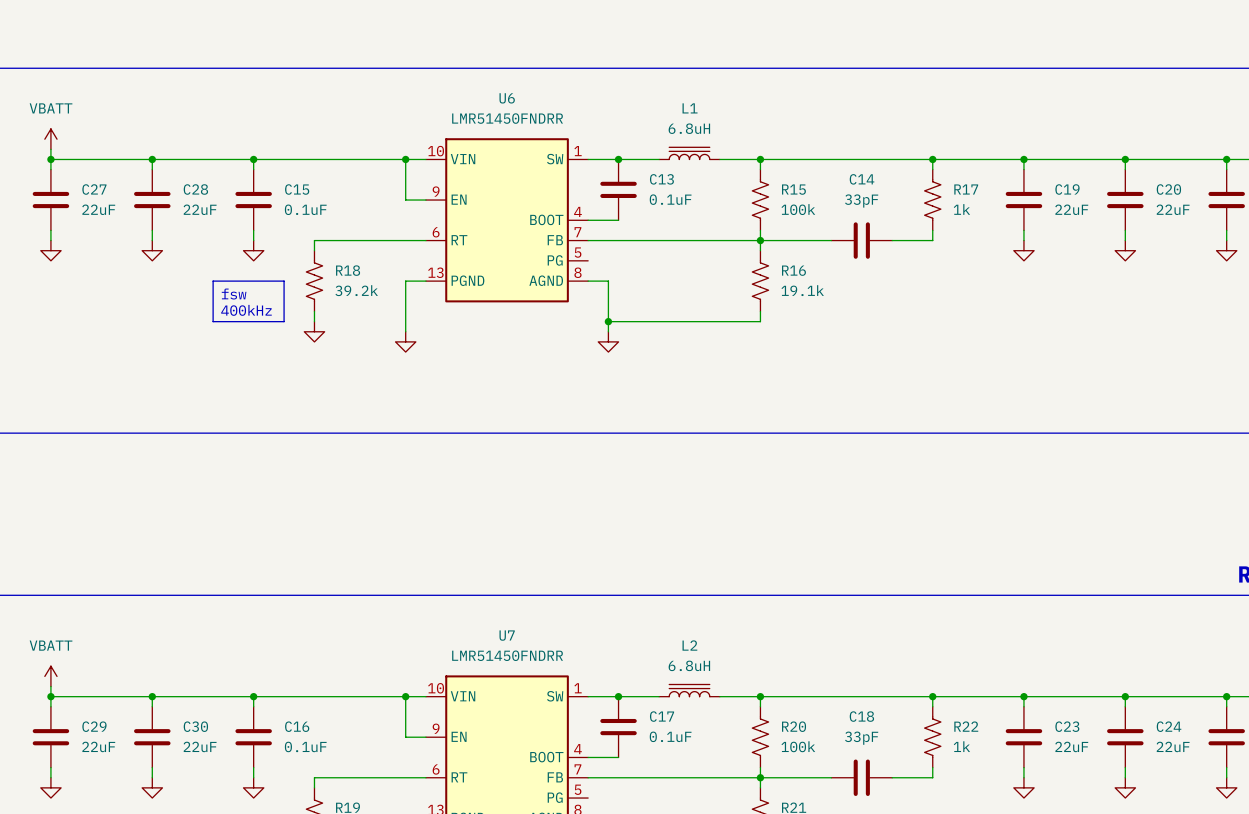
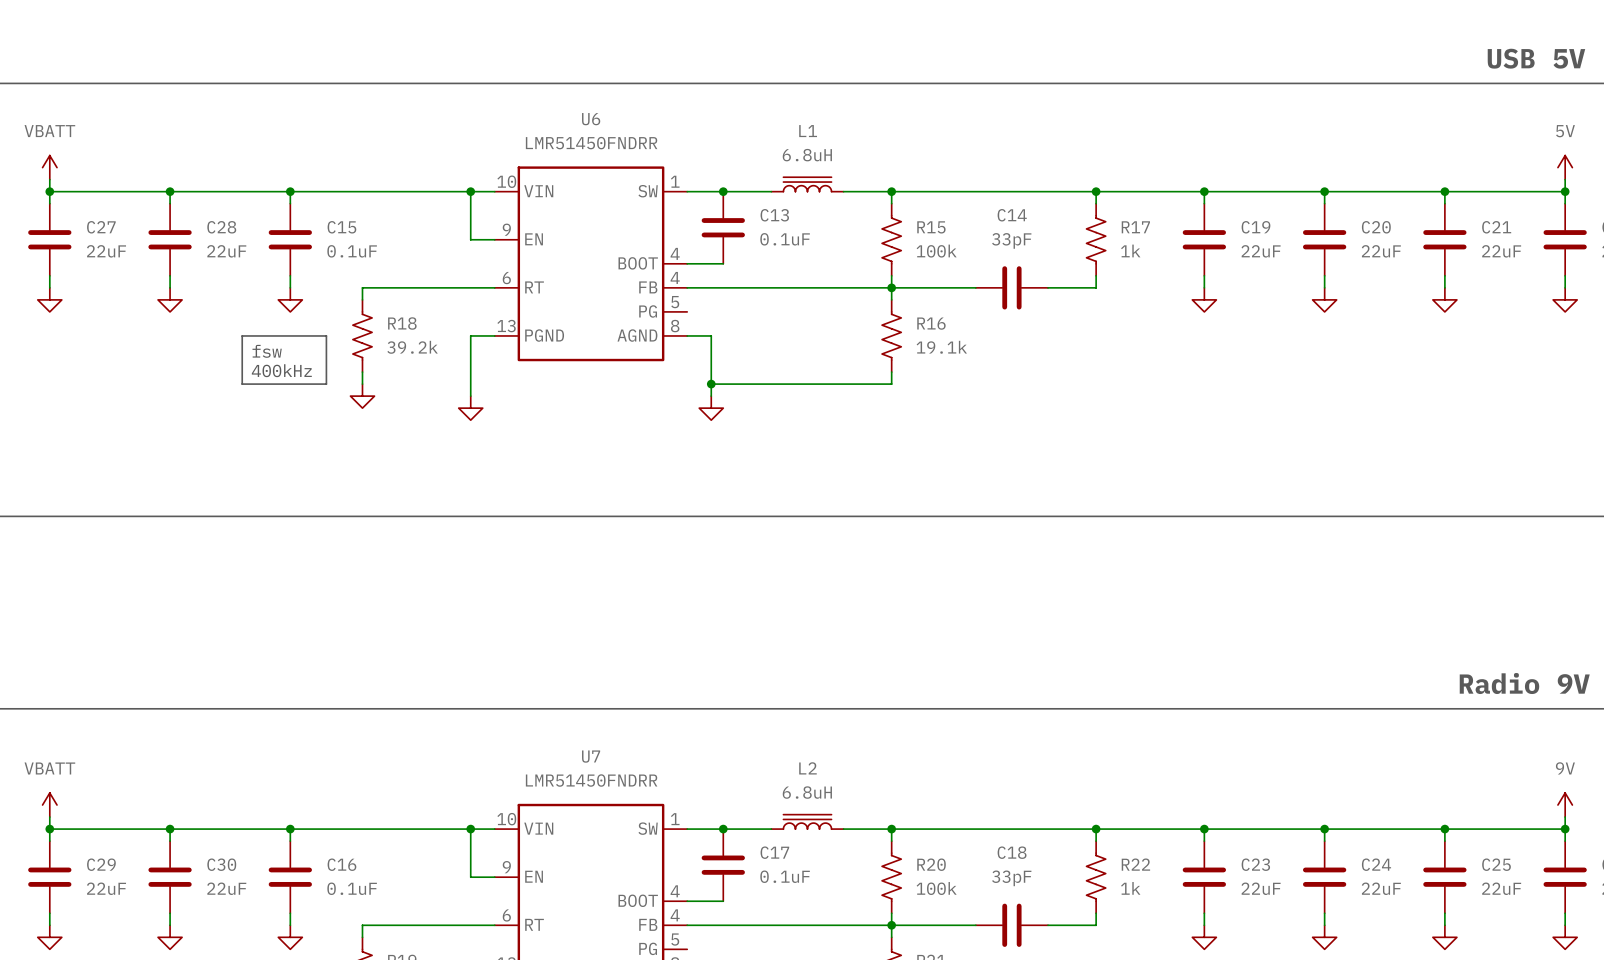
U6 pin number: 7 (577, 232) -> 4 (675, 277)
U7 pin number: 7 (577, 769) -> 4 (675, 915)

